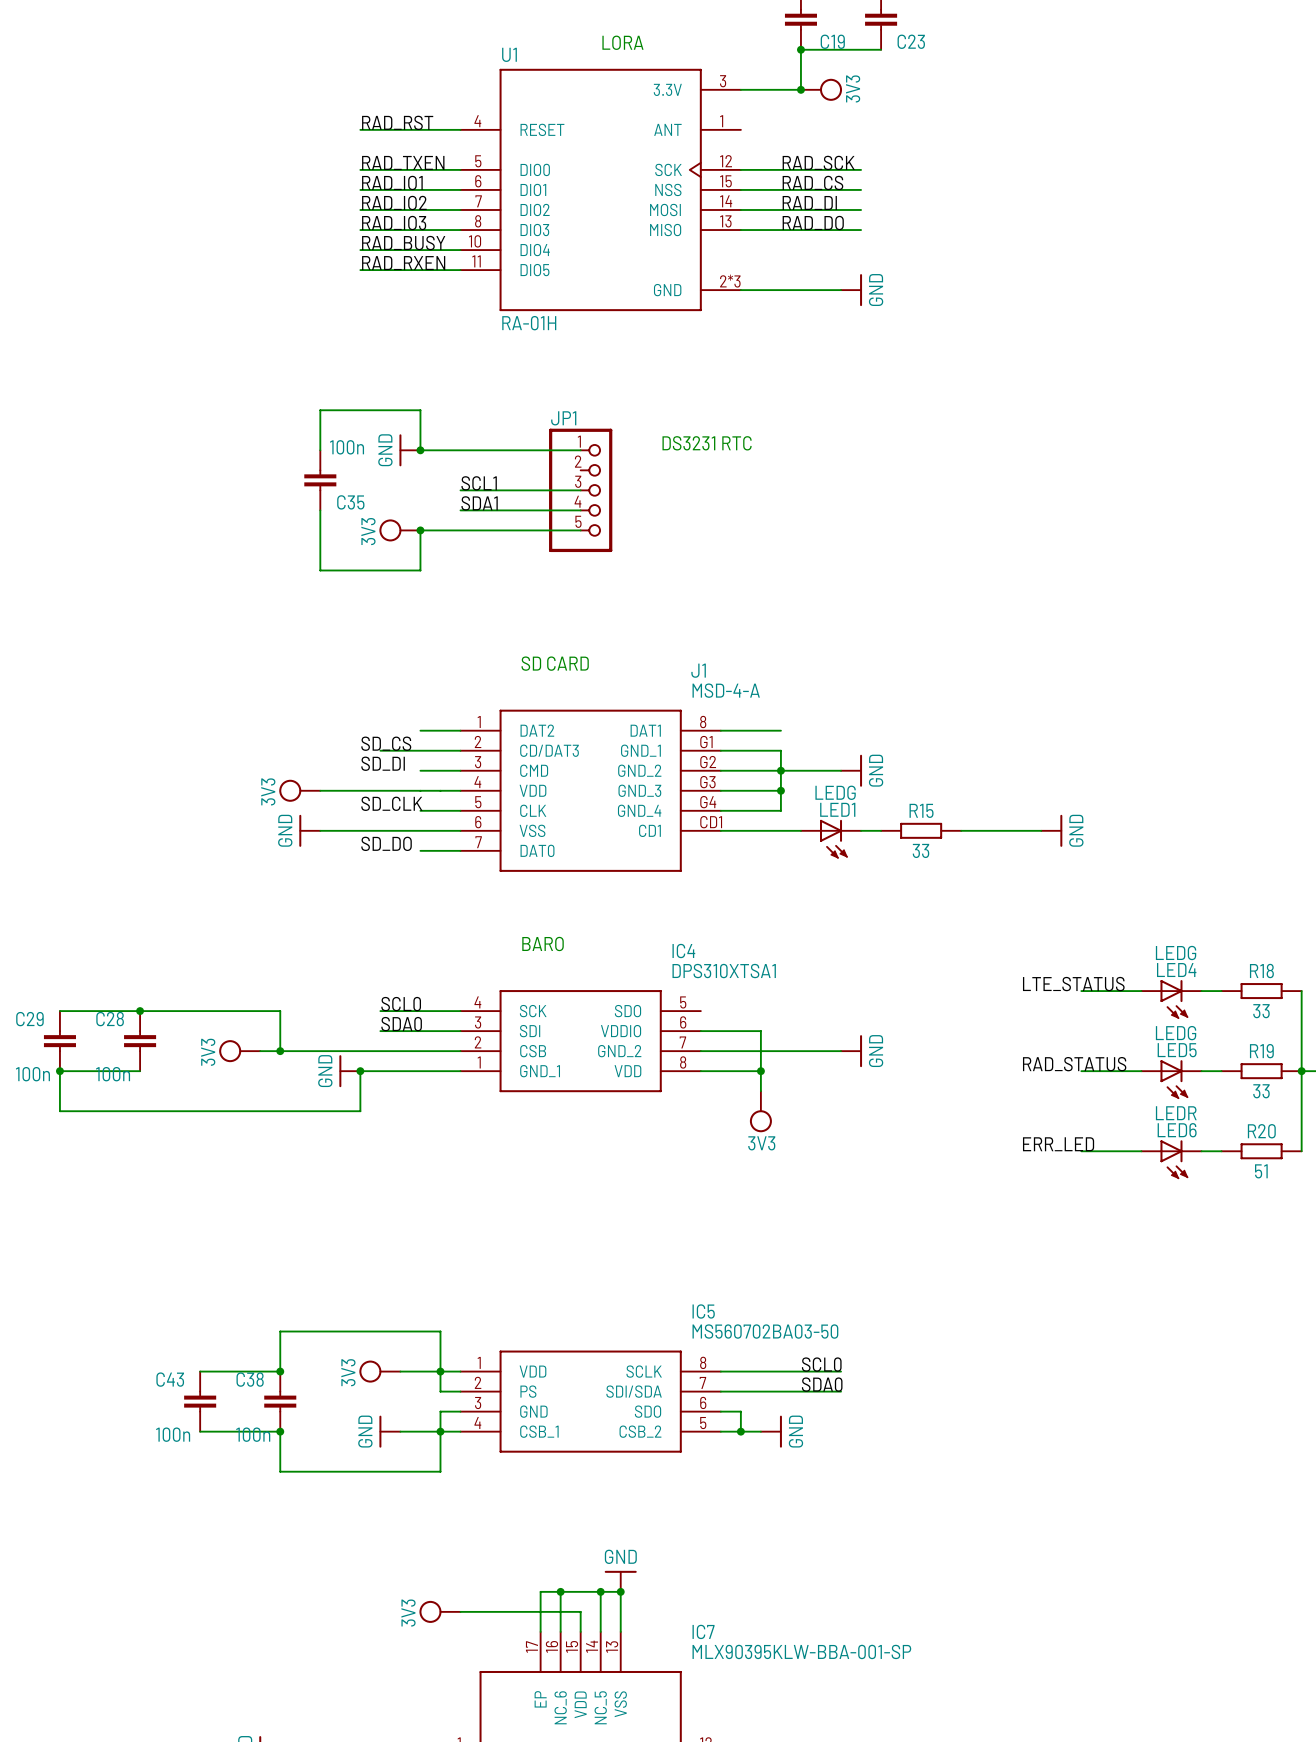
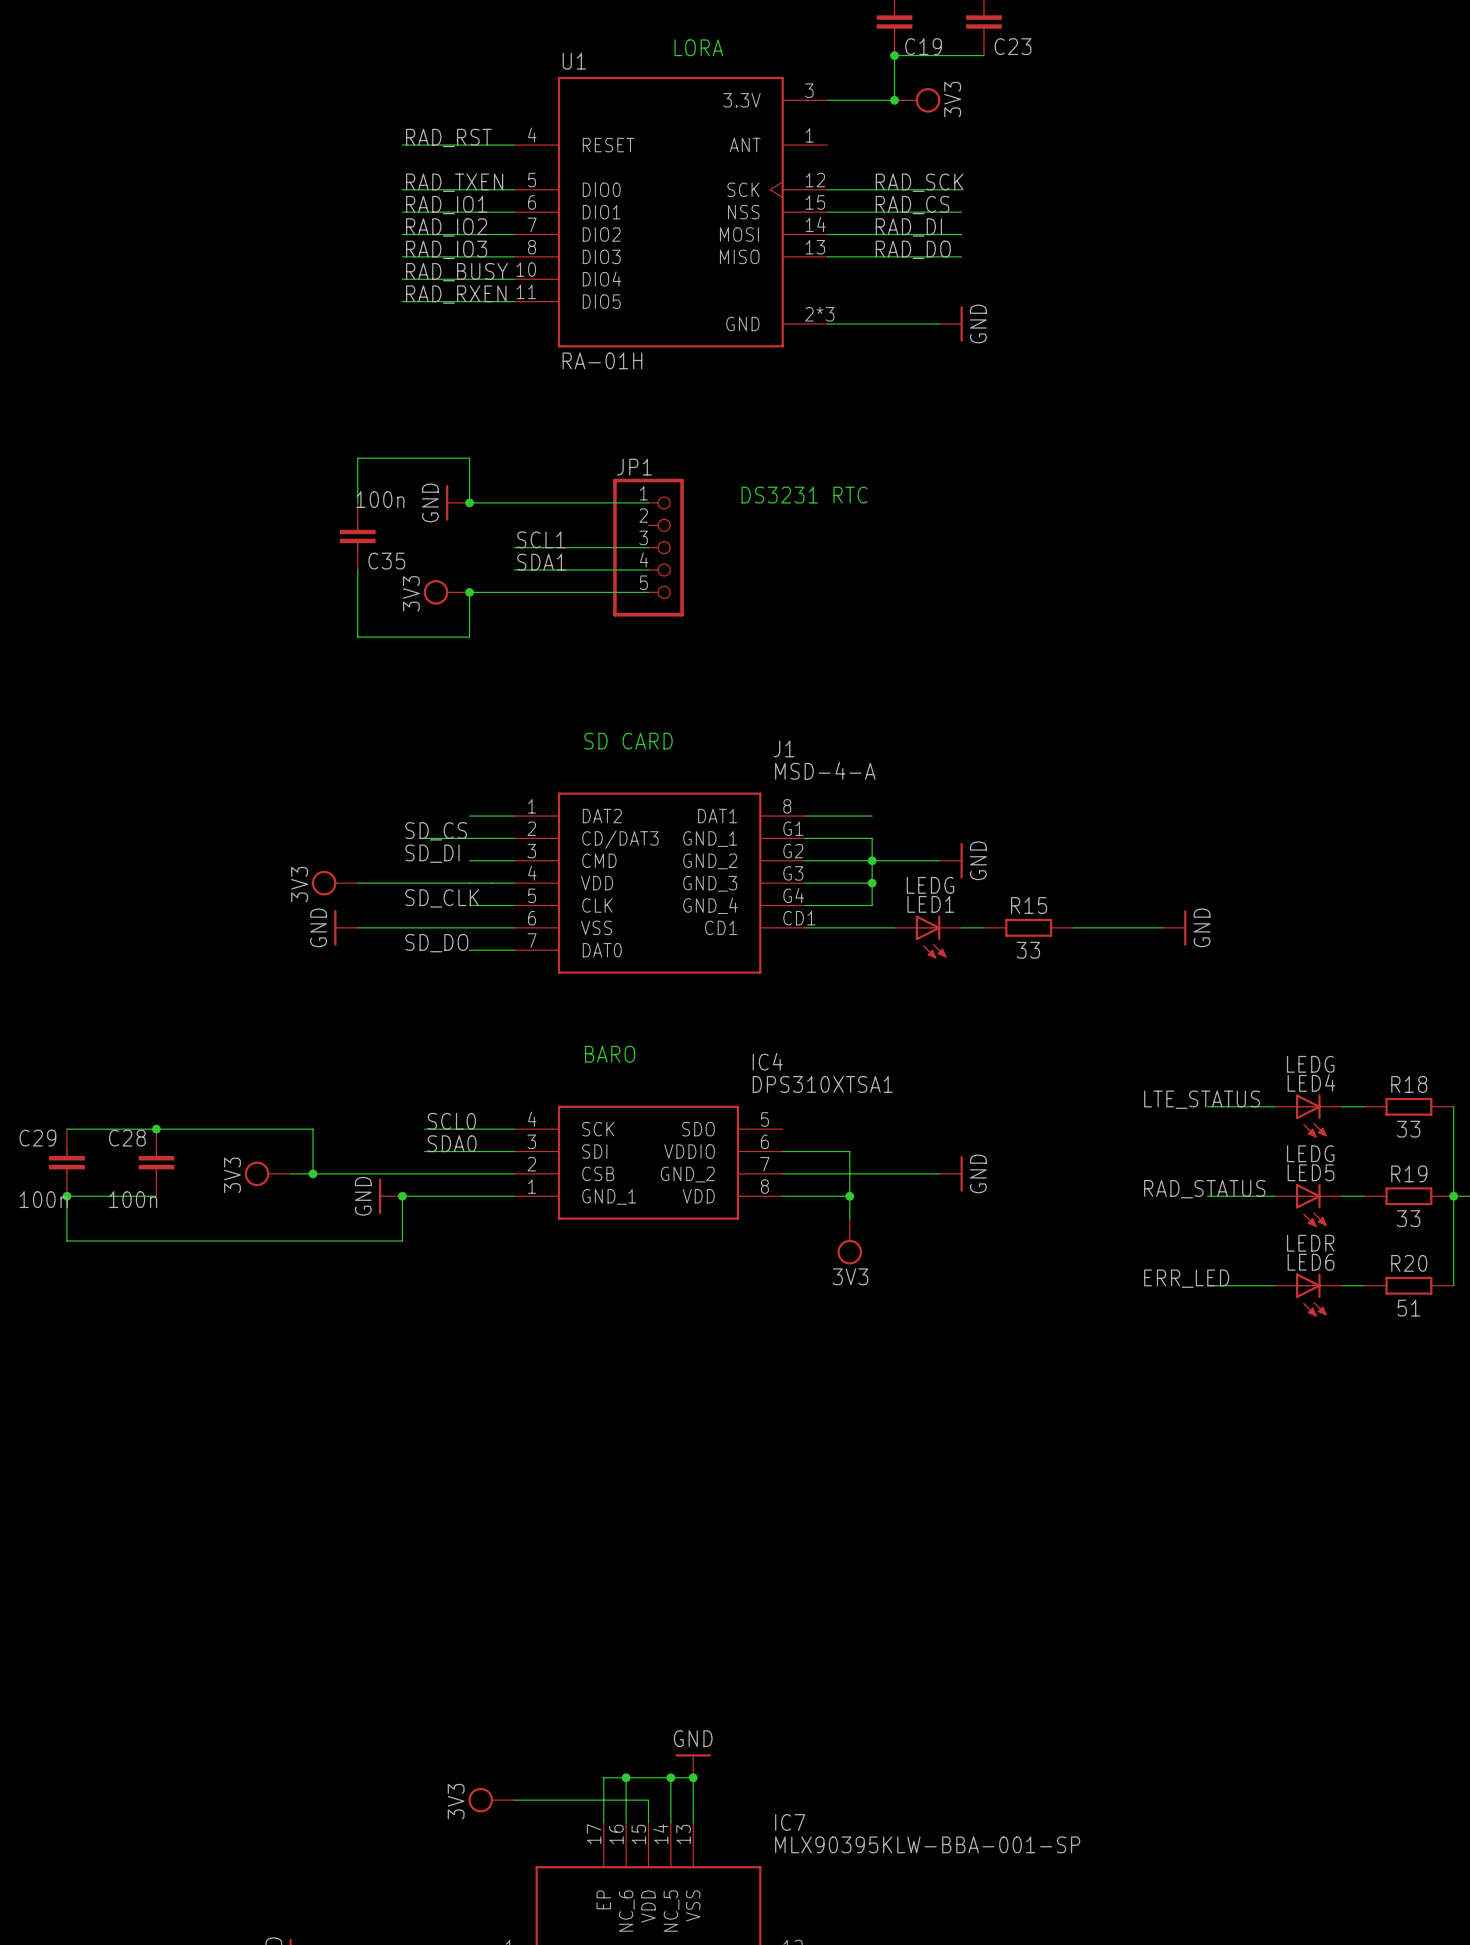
label: SCL0 (821, 1364) -> none
wire: (200, 1371) (280, 1371) (280, 1331) (440, 1331) (440, 1391) (460, 1391) -> none
junction: (280, 1371) -> none
power symbol: 3V3 (379, 1371) -> none
wire: (400, 1371) (460, 1371) -> none
junction: (440, 1371) -> none
wire: (720, 1371) (841, 1371) -> none
label: SDA0 (822, 1384) -> none
wire: (720, 1391) (841, 1391) -> none
C43: 100n (200, 1401) -> none
C38: 100n (280, 1401) -> none
IC5: MS560702BA03-50 (590, 1401) -> none
wire: (460, 1411) (440, 1411) (440, 1471) (280, 1471) (280, 1431) (200, 1431) -> none
wire: (720, 1411) (740, 1411) (740, 1431) -> none
junction: (280, 1431) -> none
power symbol: GND (389, 1431) -> none
wire: (400, 1431) (460, 1431) -> none
junction: (440, 1431) -> none
wire: (720, 1431) (760, 1431) -> none
junction: (740, 1431) -> none
power symbol: GND (771, 1431) -> none

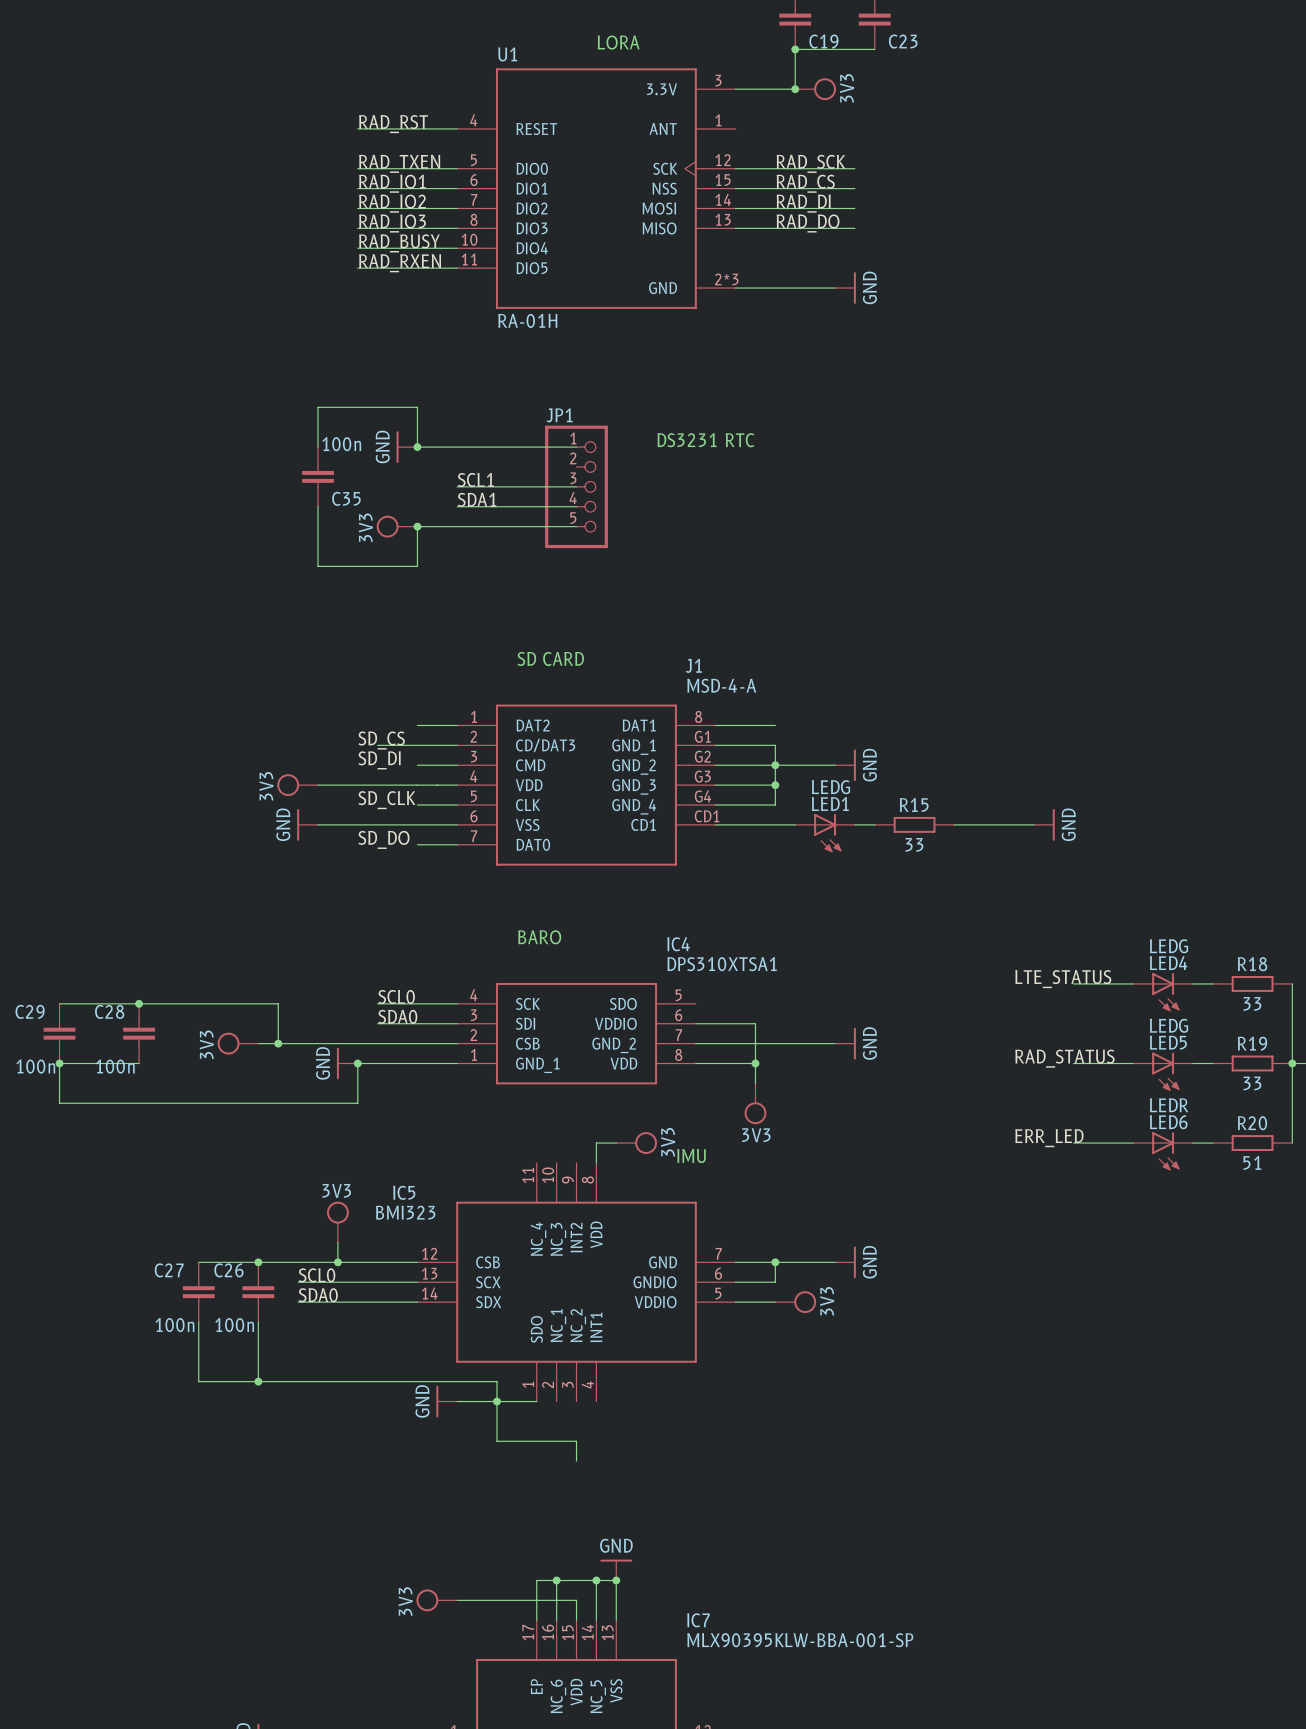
wire: none -> (616, 1143) (596, 1143) (596, 1162)
power symbol: none -> 3V3 (636, 1143)
text: none -> IMU (691, 1156)
power symbol: none -> 3V3 (337, 1222)
wire: none -> (337, 1242) (337, 1262)
wire: none -> (198, 1262) (417, 1262)
junction: none -> (258, 1262)
junction: none -> (337, 1262)
wire: none -> (735, 1262) (835, 1262)
wire: none -> (775, 1262) (775, 1282) (735, 1282)
junction: none -> (775, 1262)
power symbol: none -> GND (845, 1262)
label: none -> SCL0 (317, 1275)
wire: none -> (298, 1282) (417, 1282)
IC5: none -> BMI323 (576, 1282)
C27: none -> 100n (198, 1292)
C26: none -> 100n (258, 1292)
label: none -> SDA0 (318, 1295)
wire: none -> (298, 1302) (417, 1302)
wire: none -> (735, 1302) (775, 1302)
power symbol: none -> 3V3 (795, 1302)
wire: none -> (198, 1321) (198, 1381) (496, 1381) (496, 1441) (576, 1441) (576, 1461)
wire: none -> (258, 1321) (258, 1381)
junction: none -> (258, 1381)
power symbol: none -> GND (446, 1401)
wire: none -> (457, 1401) (536, 1401)
junction: none -> (496, 1401)

